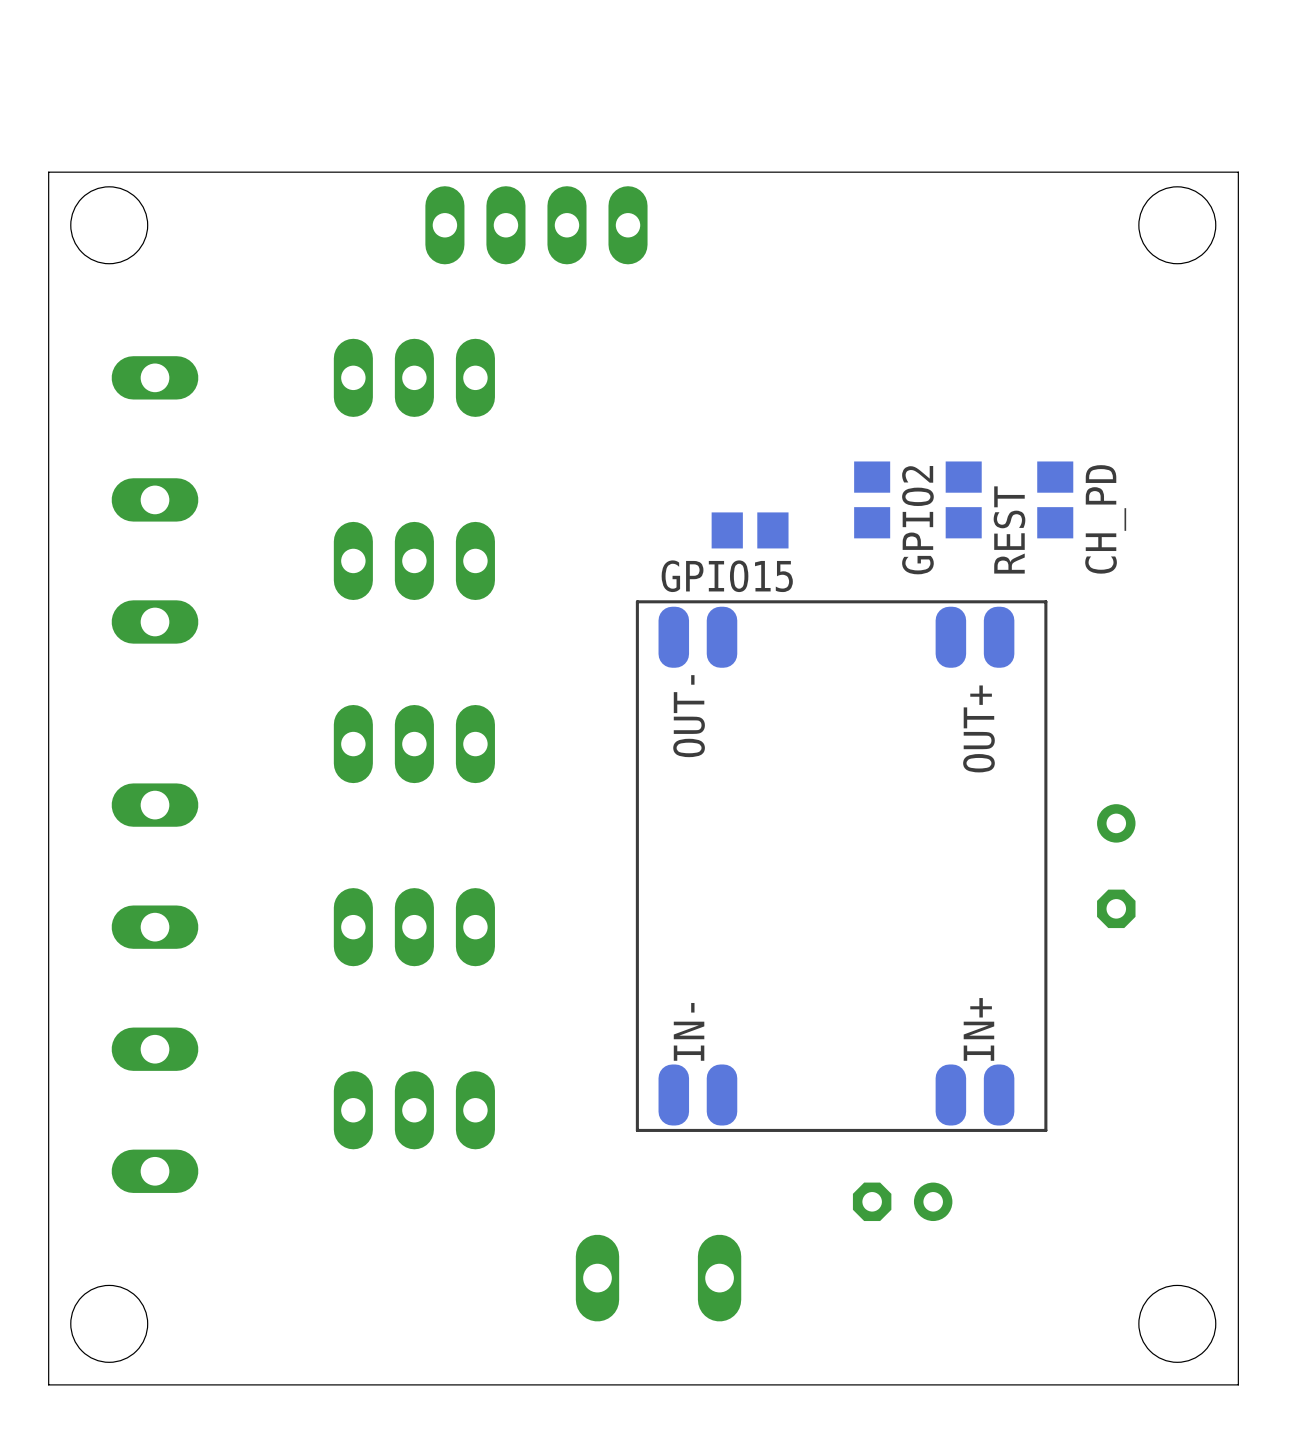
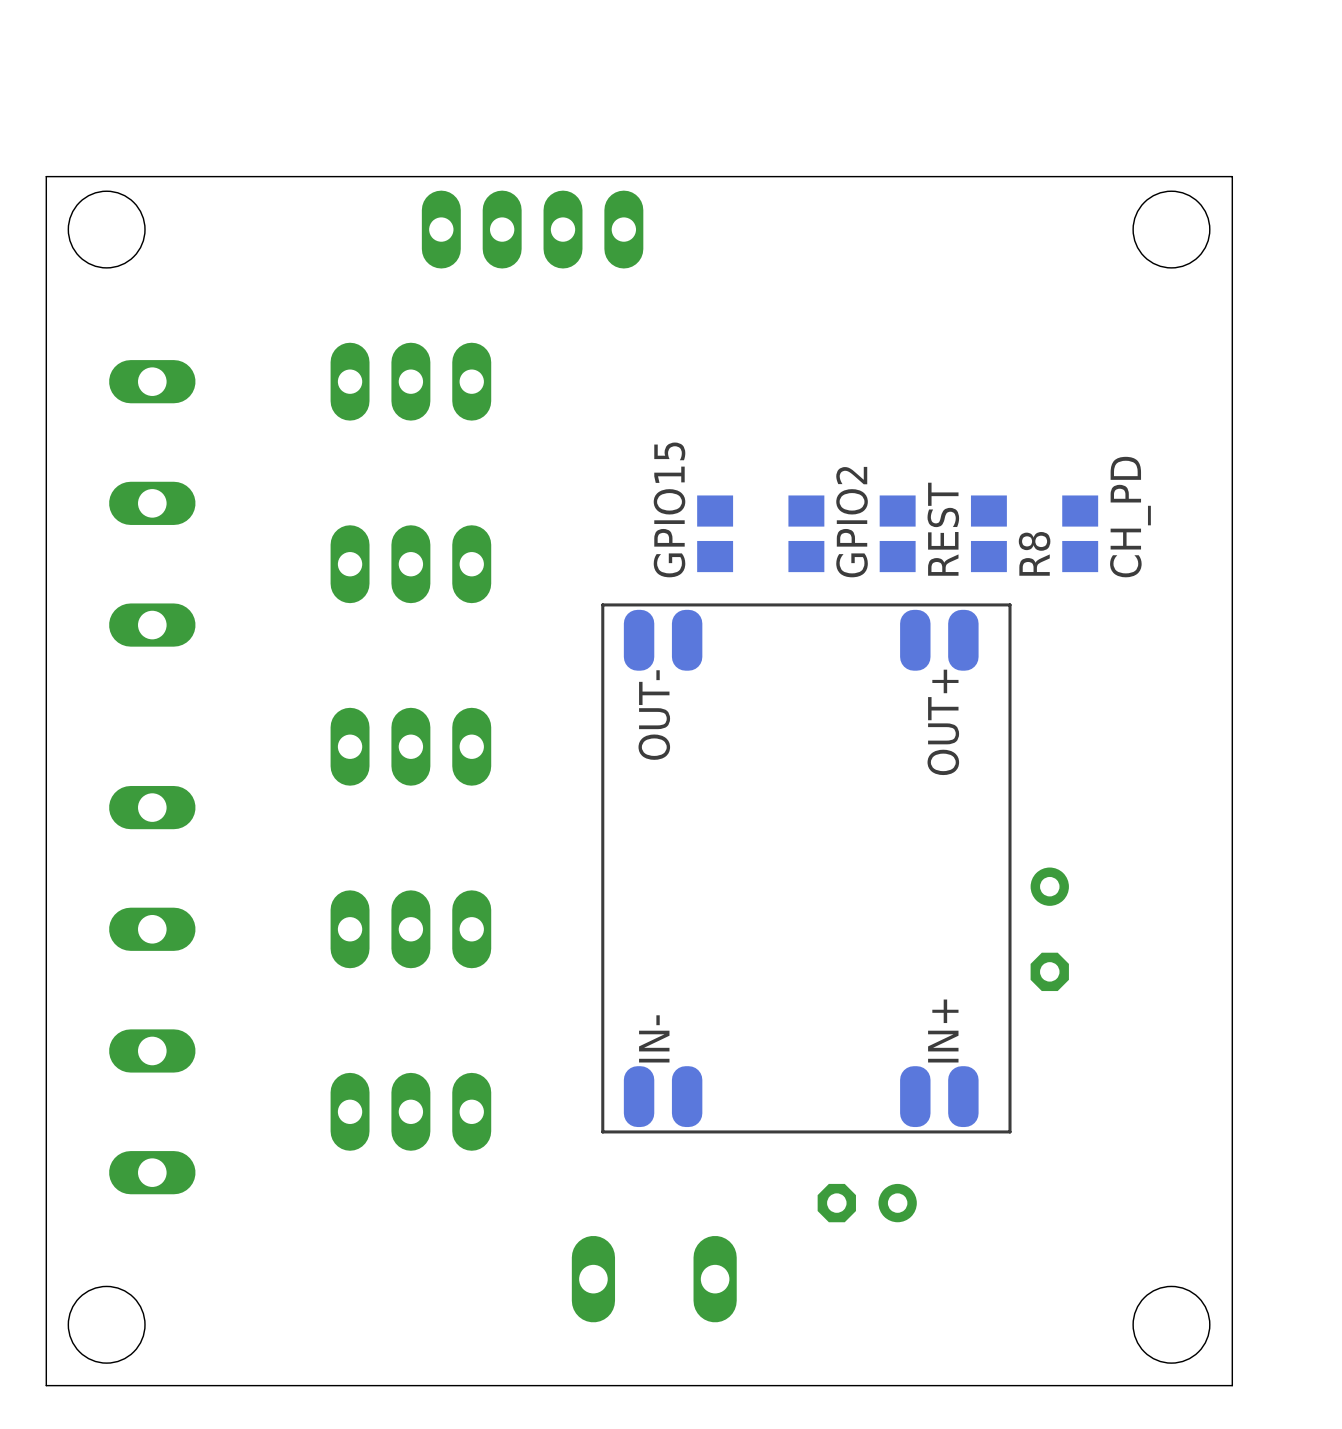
GPIO2 position: (872, 499) -> (806, 533)
REST position: (963, 499) -> (897, 533)
CH_PD position: (1055, 499) -> (1080, 533)
CH_PD name position: CH_PD (1105, 519) -> CH_PD (1130, 517)
GPIO2 name position: GPIO2 (917, 520) -> GPIO2 (852, 522)
REST name position: REST (1009, 529) -> REST (943, 529)
GPIO15 rotation: 0° (750, 530) -> 90° clockwise (715, 533)
R8: none -> (988, 533)
part position: (841, 866) -> (806, 868)
part position: (1116, 866) -> (1049, 929)
part position: (902, 1201) -> (867, 1203)

